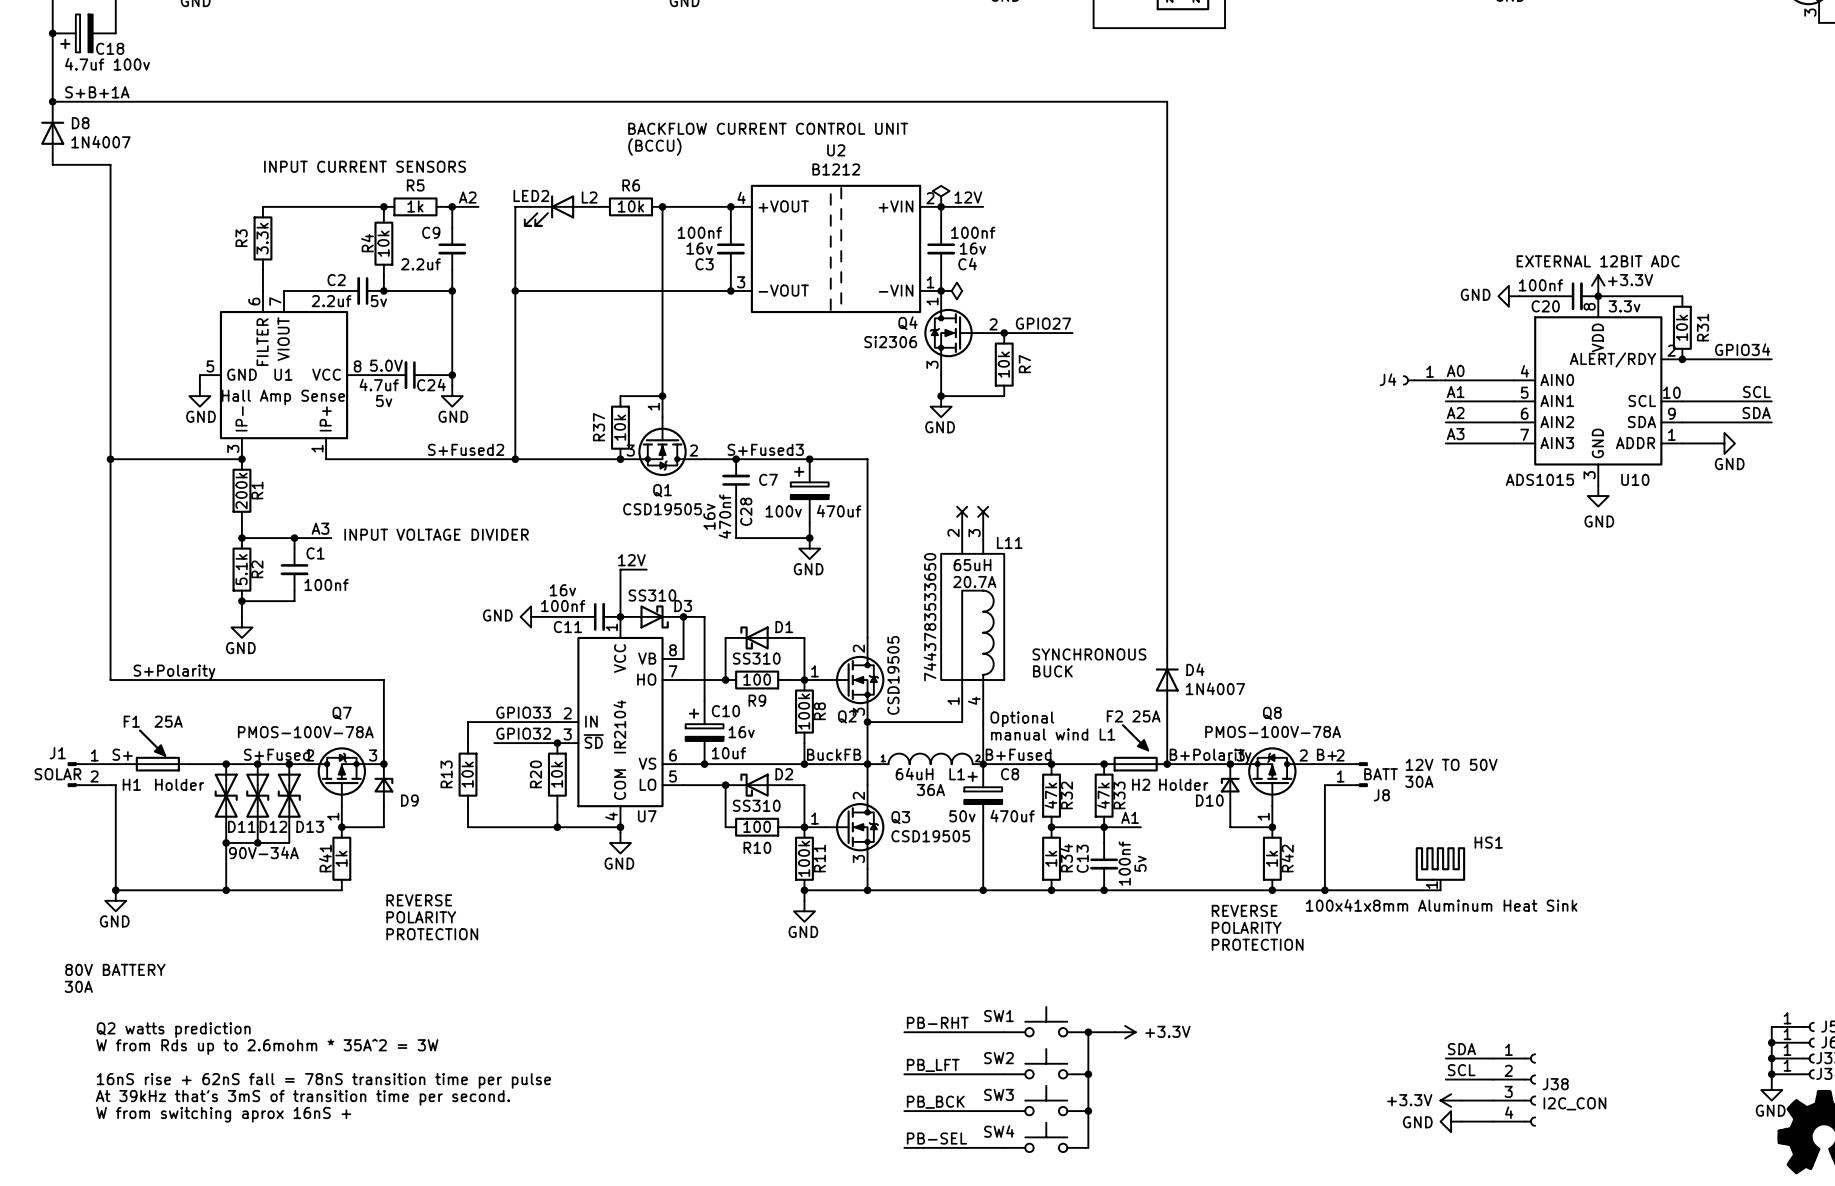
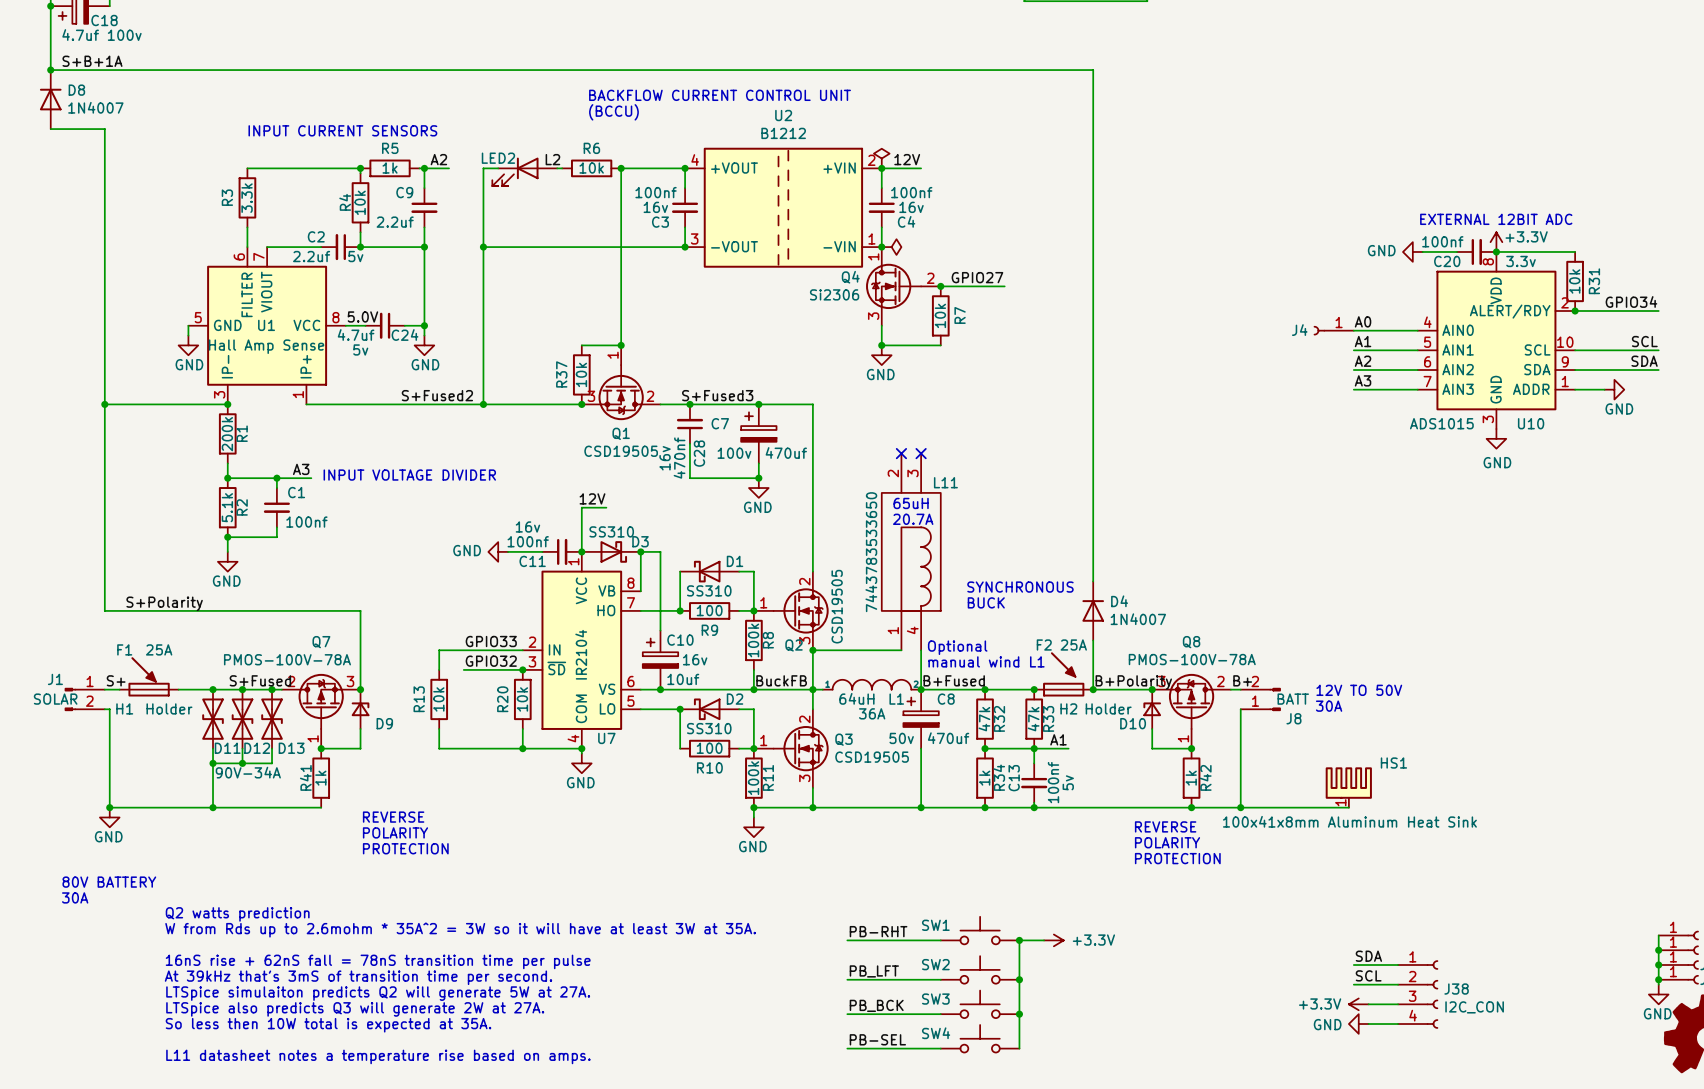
text: none -> W from Rds up to 2.6mohm * 35A^2 = 3W so it will have at least 3W at 35A. (460, 930)
text position: Q2 watts prediction (173, 1030) -> Q2 watts prediction (237, 914)
text: W from Rds up to 2.6mohm * 35A^2 = 3W (267, 1046) -> none
text position: 16nS rise + 62nS fall = 78nS transition time per pulse (323, 1080) -> 16nS rise + 62nS fall = 78nS transition time per pulse (378, 961)
text: none -> LTSpice simulaiton predicts Q2 will generate 5W at 27A. (378, 993)
text position: At 39kHz that's 3mS of transition time per second. (302, 1097) -> At 39kHz that's 3mS of transition time per second. (358, 977)
text: none -> LTSpice also predicts Q3 will generate 2W at 27A. (355, 1009)
text: W from switching aprox 16nS + (223, 1114) -> none
text: none -> So less then 10W total is expected at 35A. (328, 1025)
text: none -> L11 datasheet notes a temperature rise based on amps. (378, 1056)

